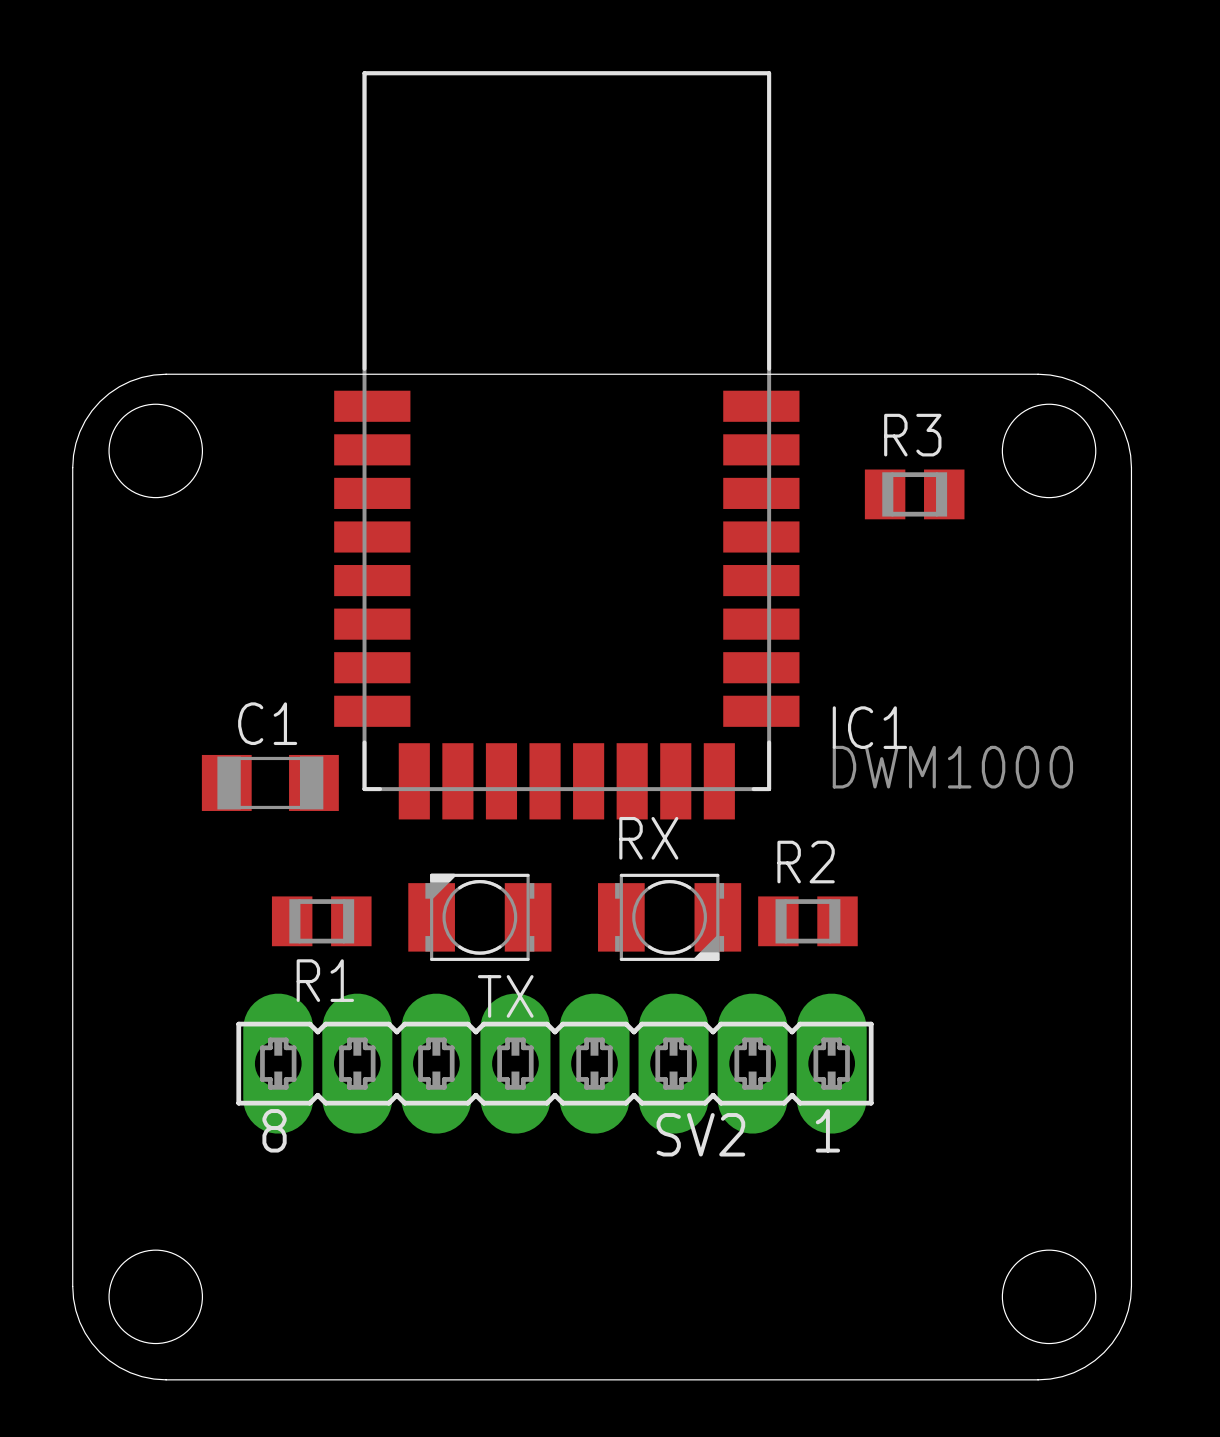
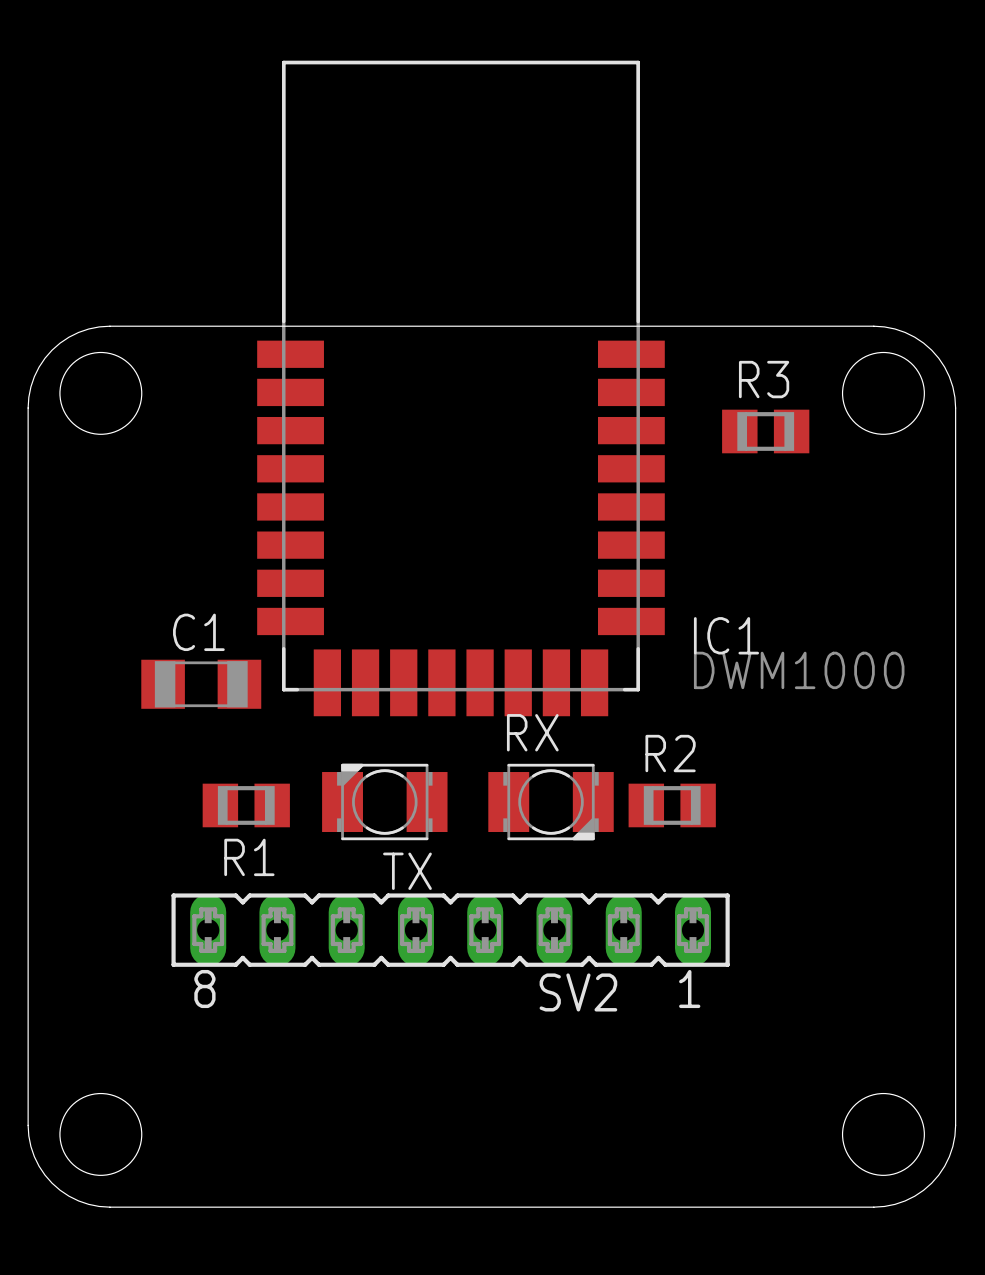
SV2 footprint: [236, 993, 874, 1134] -> [171, 893, 730, 967]

